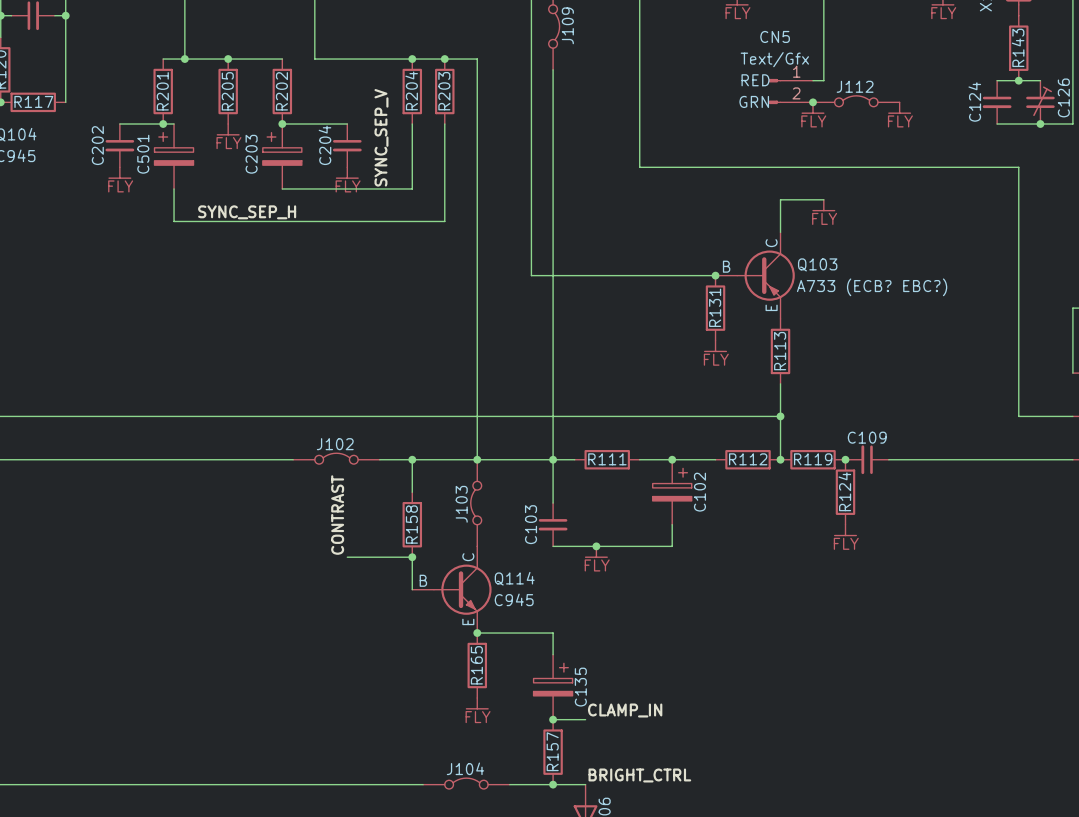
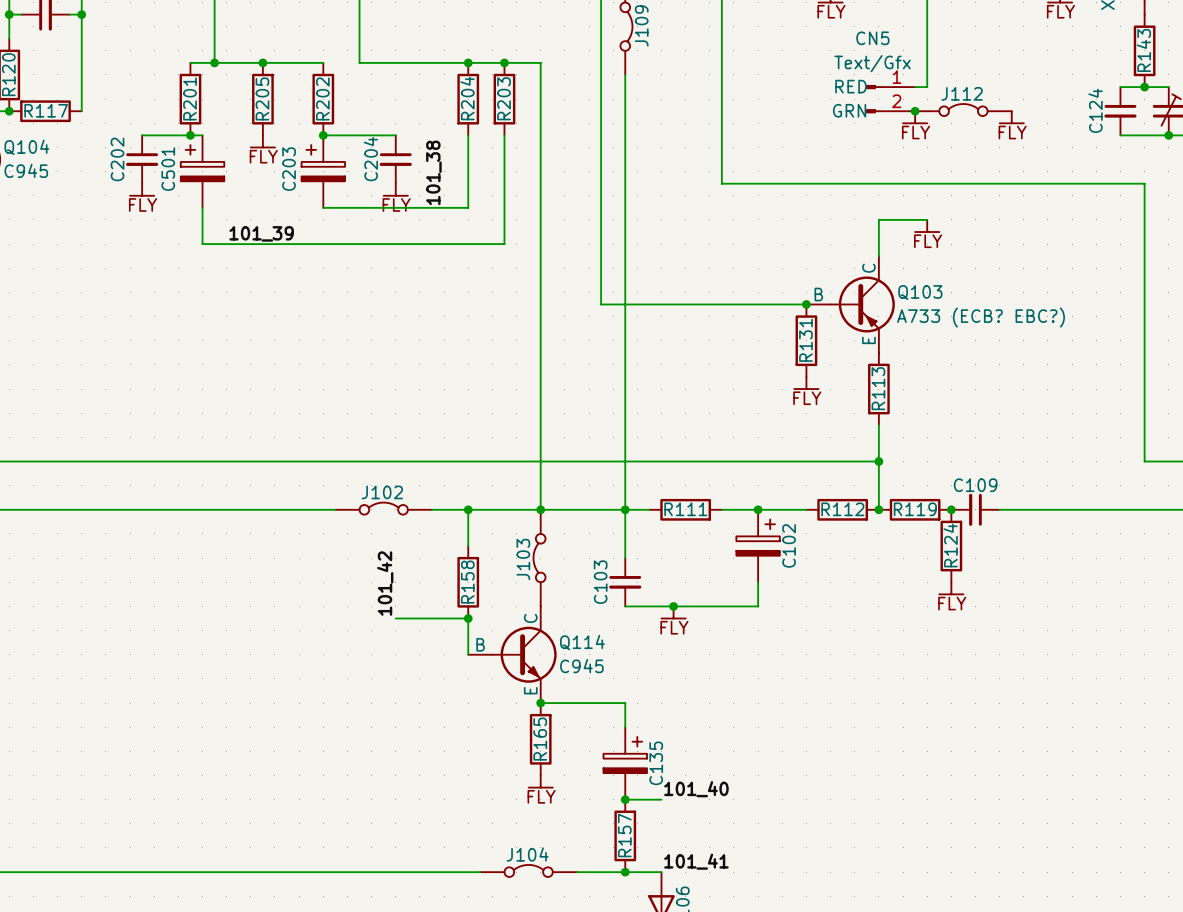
label: SYNC_SEP_V (381, 137) -> 101_38 (433, 172)
label: SYNC_SEP_H (247, 212) -> 101_39 (261, 233)
label: CONTRAST (337, 515) -> 101_42 (385, 583)
label: CLAMP_IN (625, 710) -> 101_40 (696, 789)
label: BRIGHT_CTRL (639, 775) -> 101_41 (696, 861)

